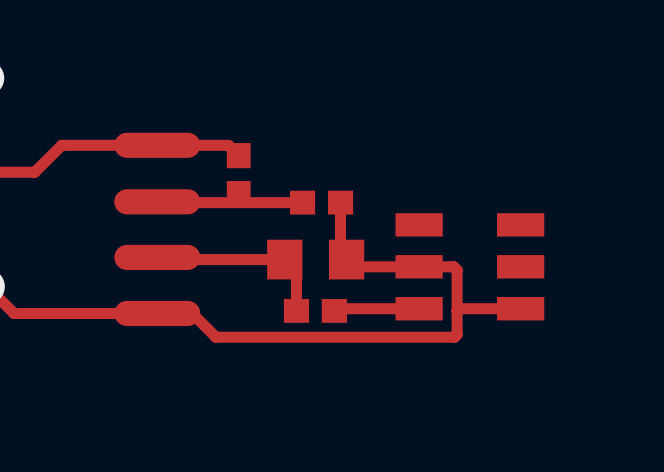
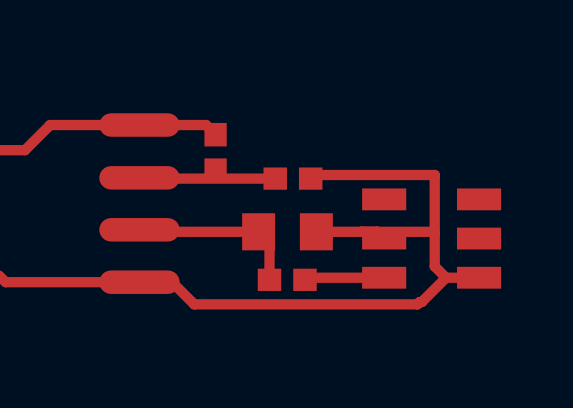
top track: (340, 202) (340, 259) -> none
top track: none -> (434, 233) (433, 231) (316, 231) (323, 238)
top track: (347, 266) (453, 266) (457, 270) (457, 334) -> (310, 178) (314, 174) (434, 174) (434, 266) (446, 277) (419, 302)
top track: (485, 308) (459, 308) (457, 310) -> none

